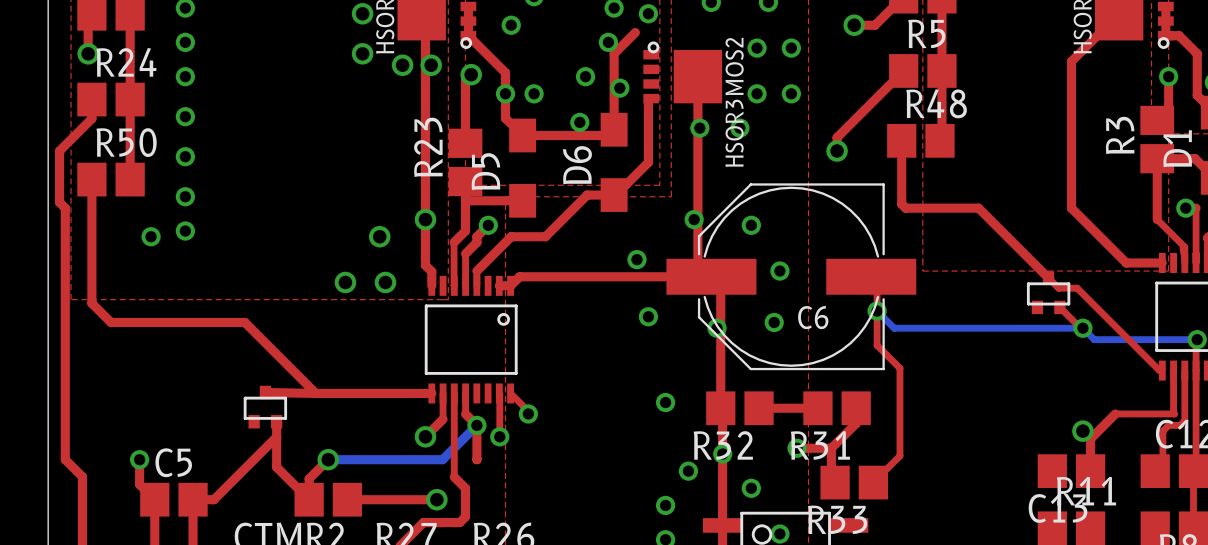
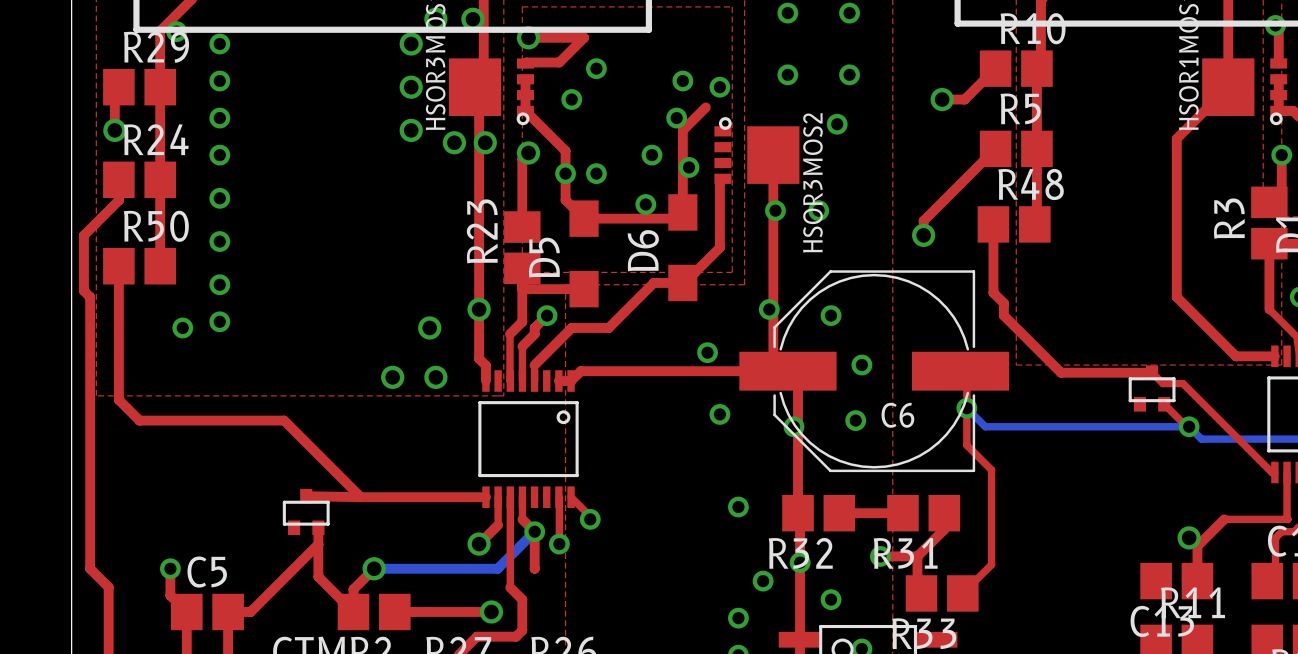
via: (791, 48) -> none
via: (757, 93) -> none
via: (791, 93) -> none
top track: (905, 208) (978, 208) (1048, 278) -> (997, 297) (1003, 303) (1003, 315) (1060, 372) (1152, 372)

